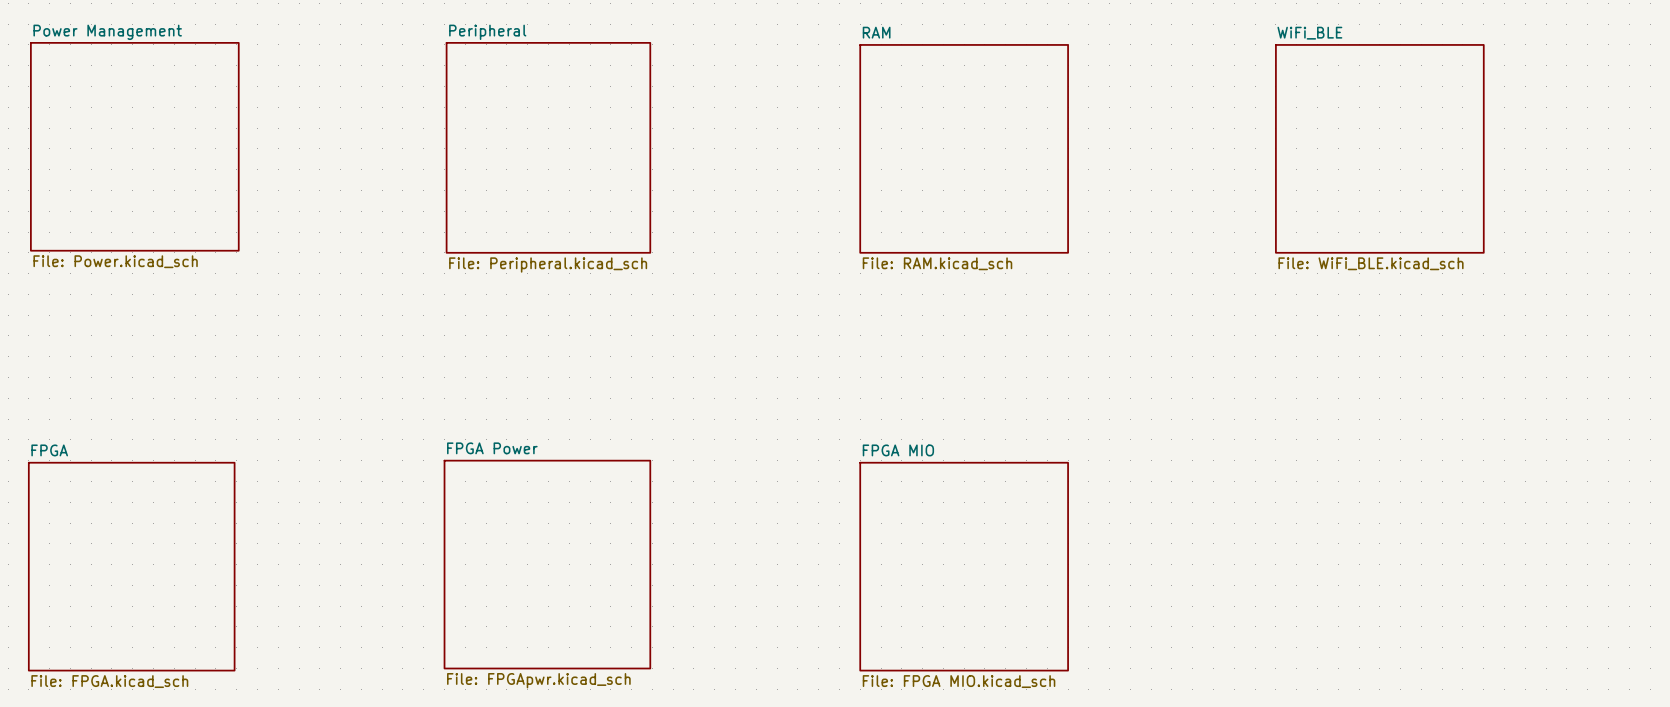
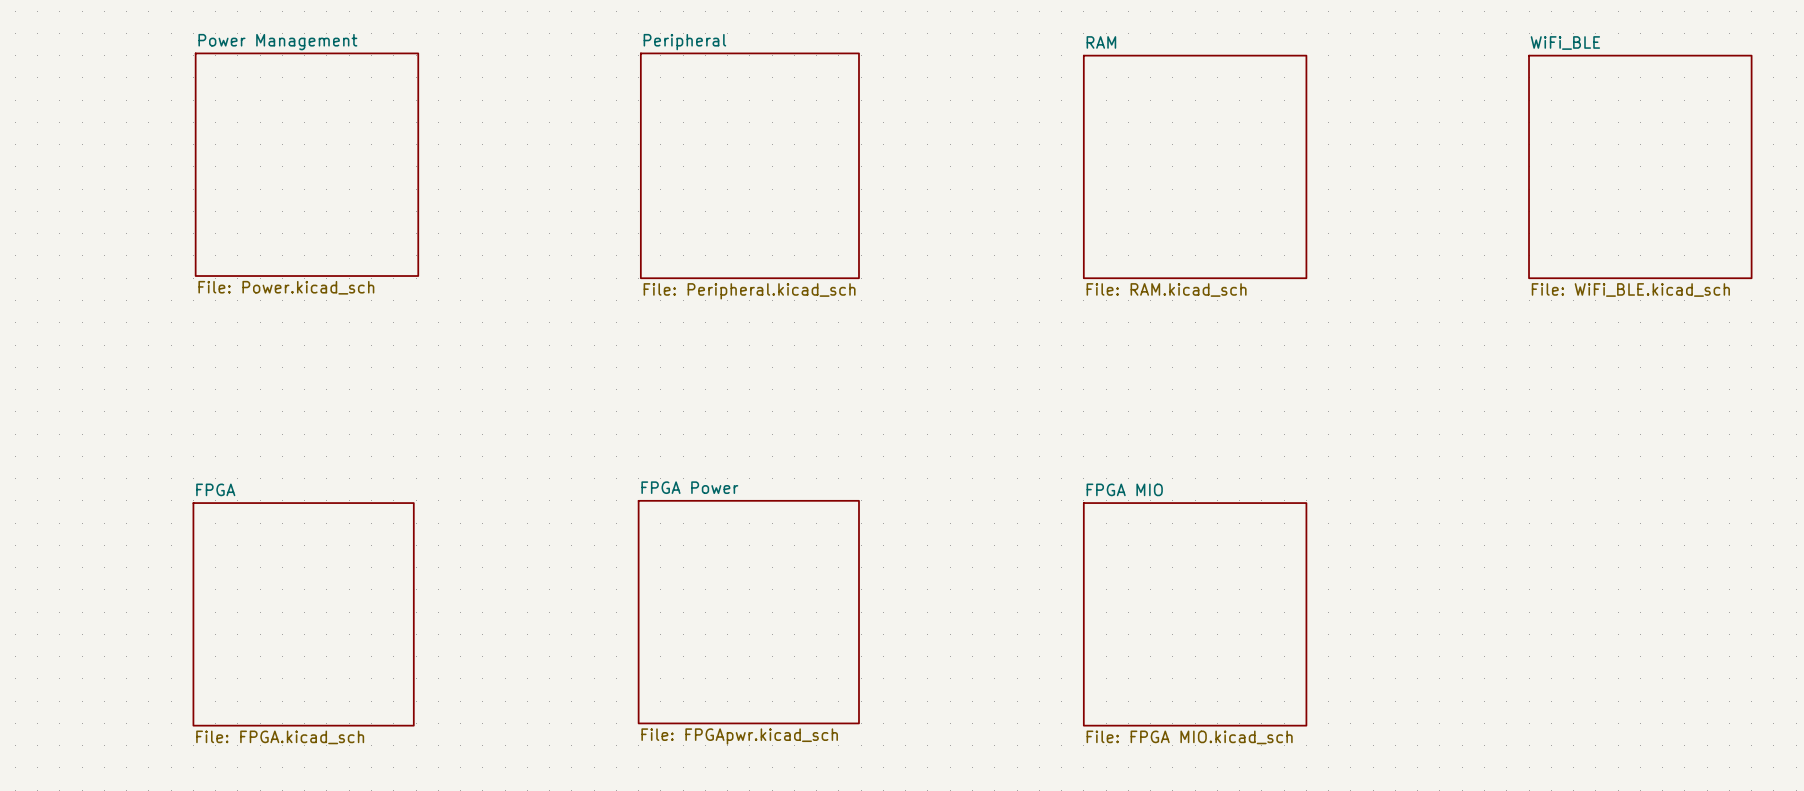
sheet Power Management position: (134, 146) -> (306, 164)
sheet Peripheral position: (548, 147) -> (749, 165)
sheet RAM position: (964, 148) -> (1195, 166)
sheet WiFi_BLE position: (1379, 148) -> (1640, 166)
sheet FPGA Power position: (547, 564) -> (748, 612)
sheet FPGA position: (131, 566) -> (303, 614)
sheet FPGA MIO position: (964, 566) -> (1195, 614)

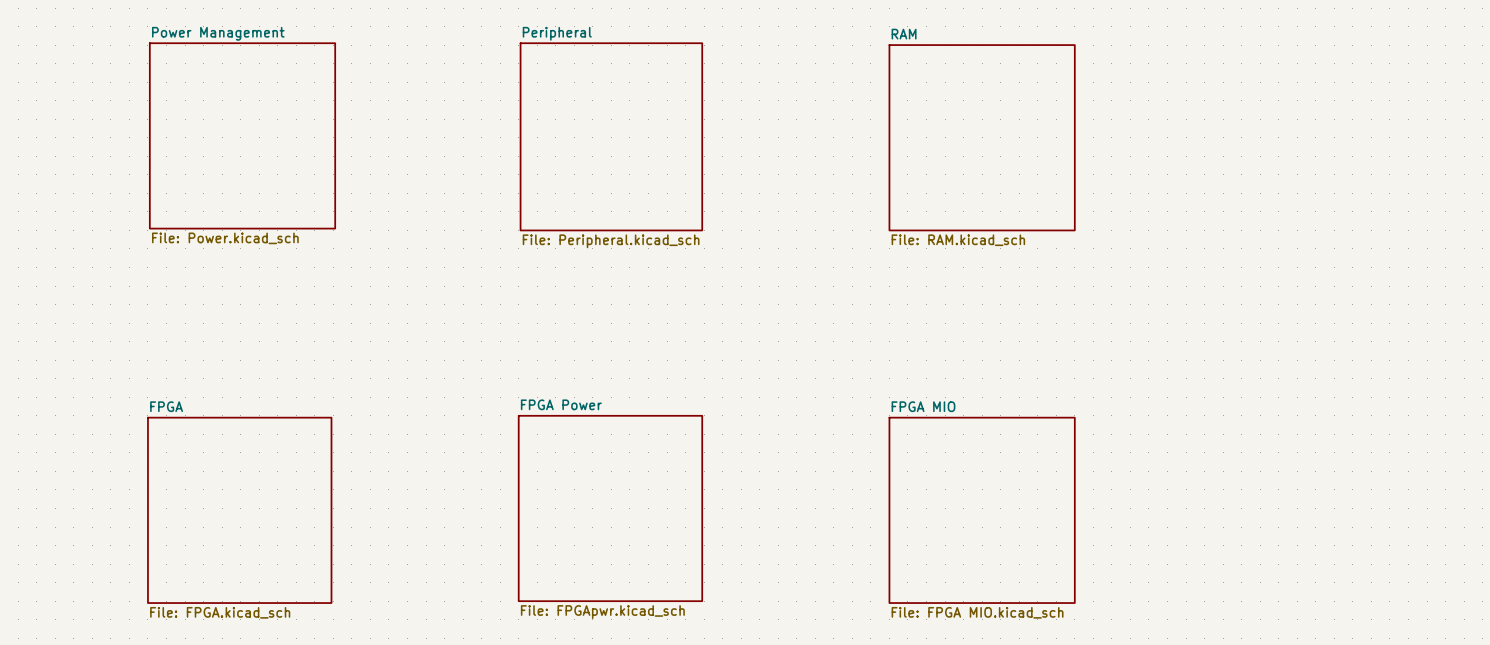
sheet WiFi_BLE: File: WiFi_BLE.kicad_sch (1640, 166) -> none

